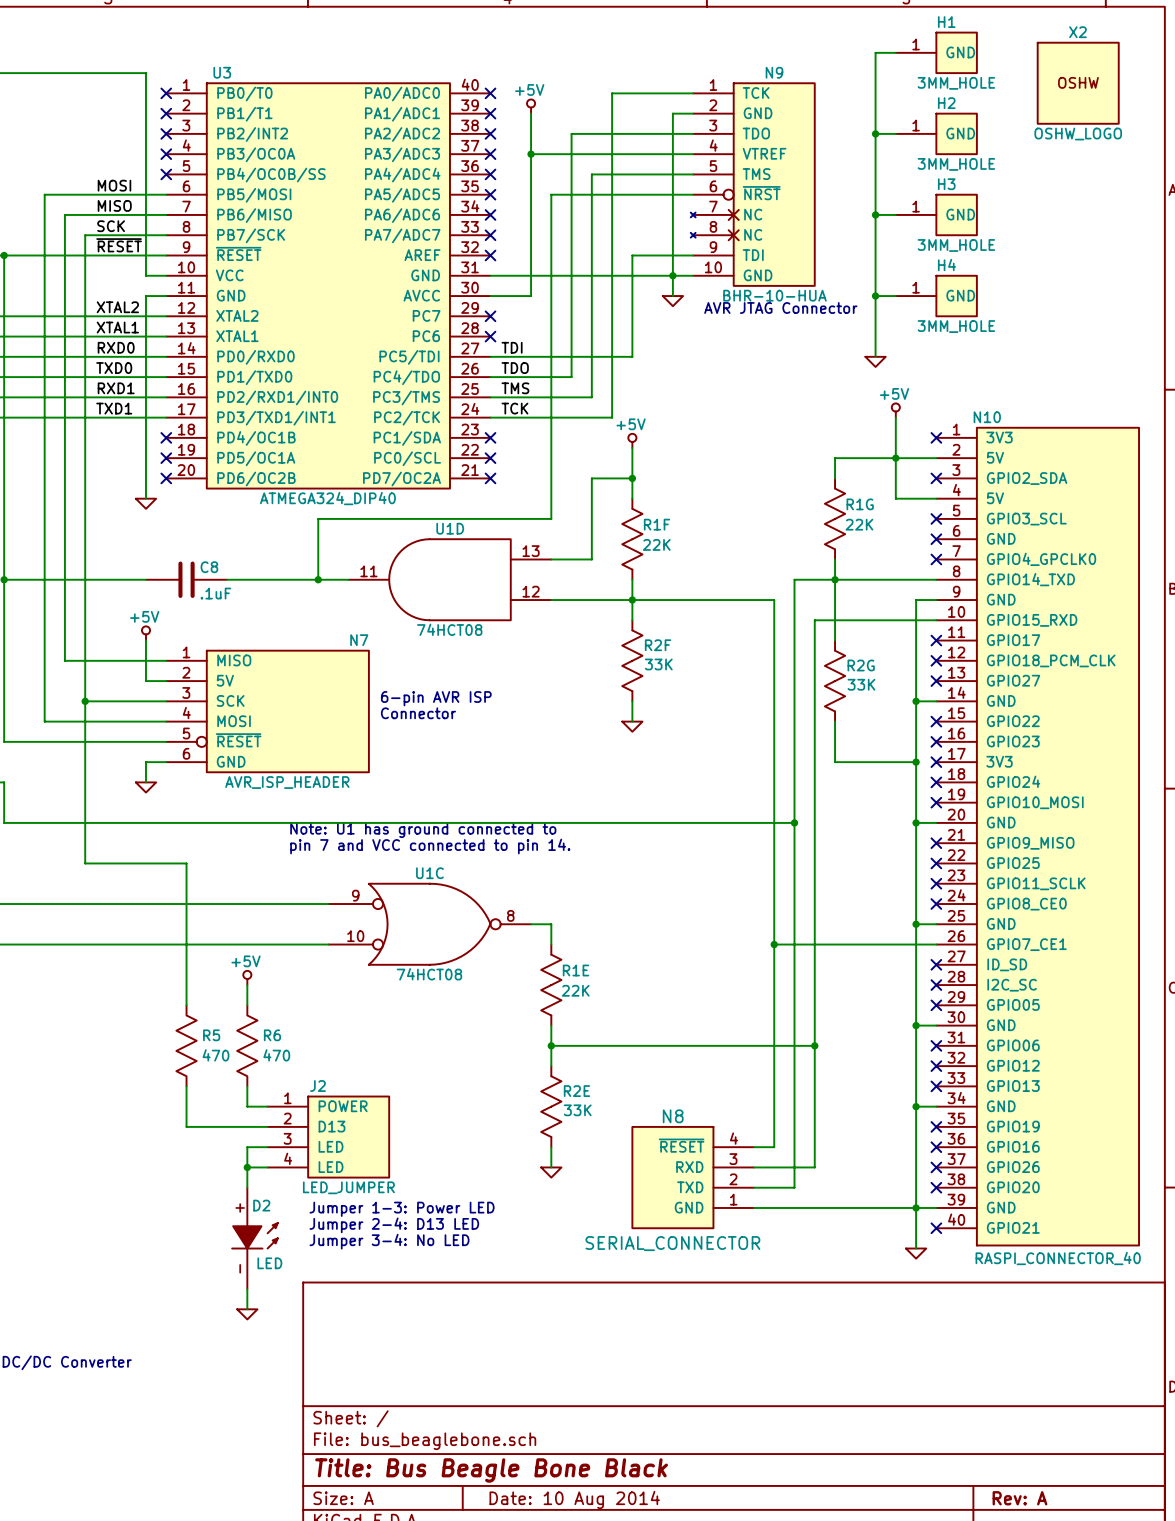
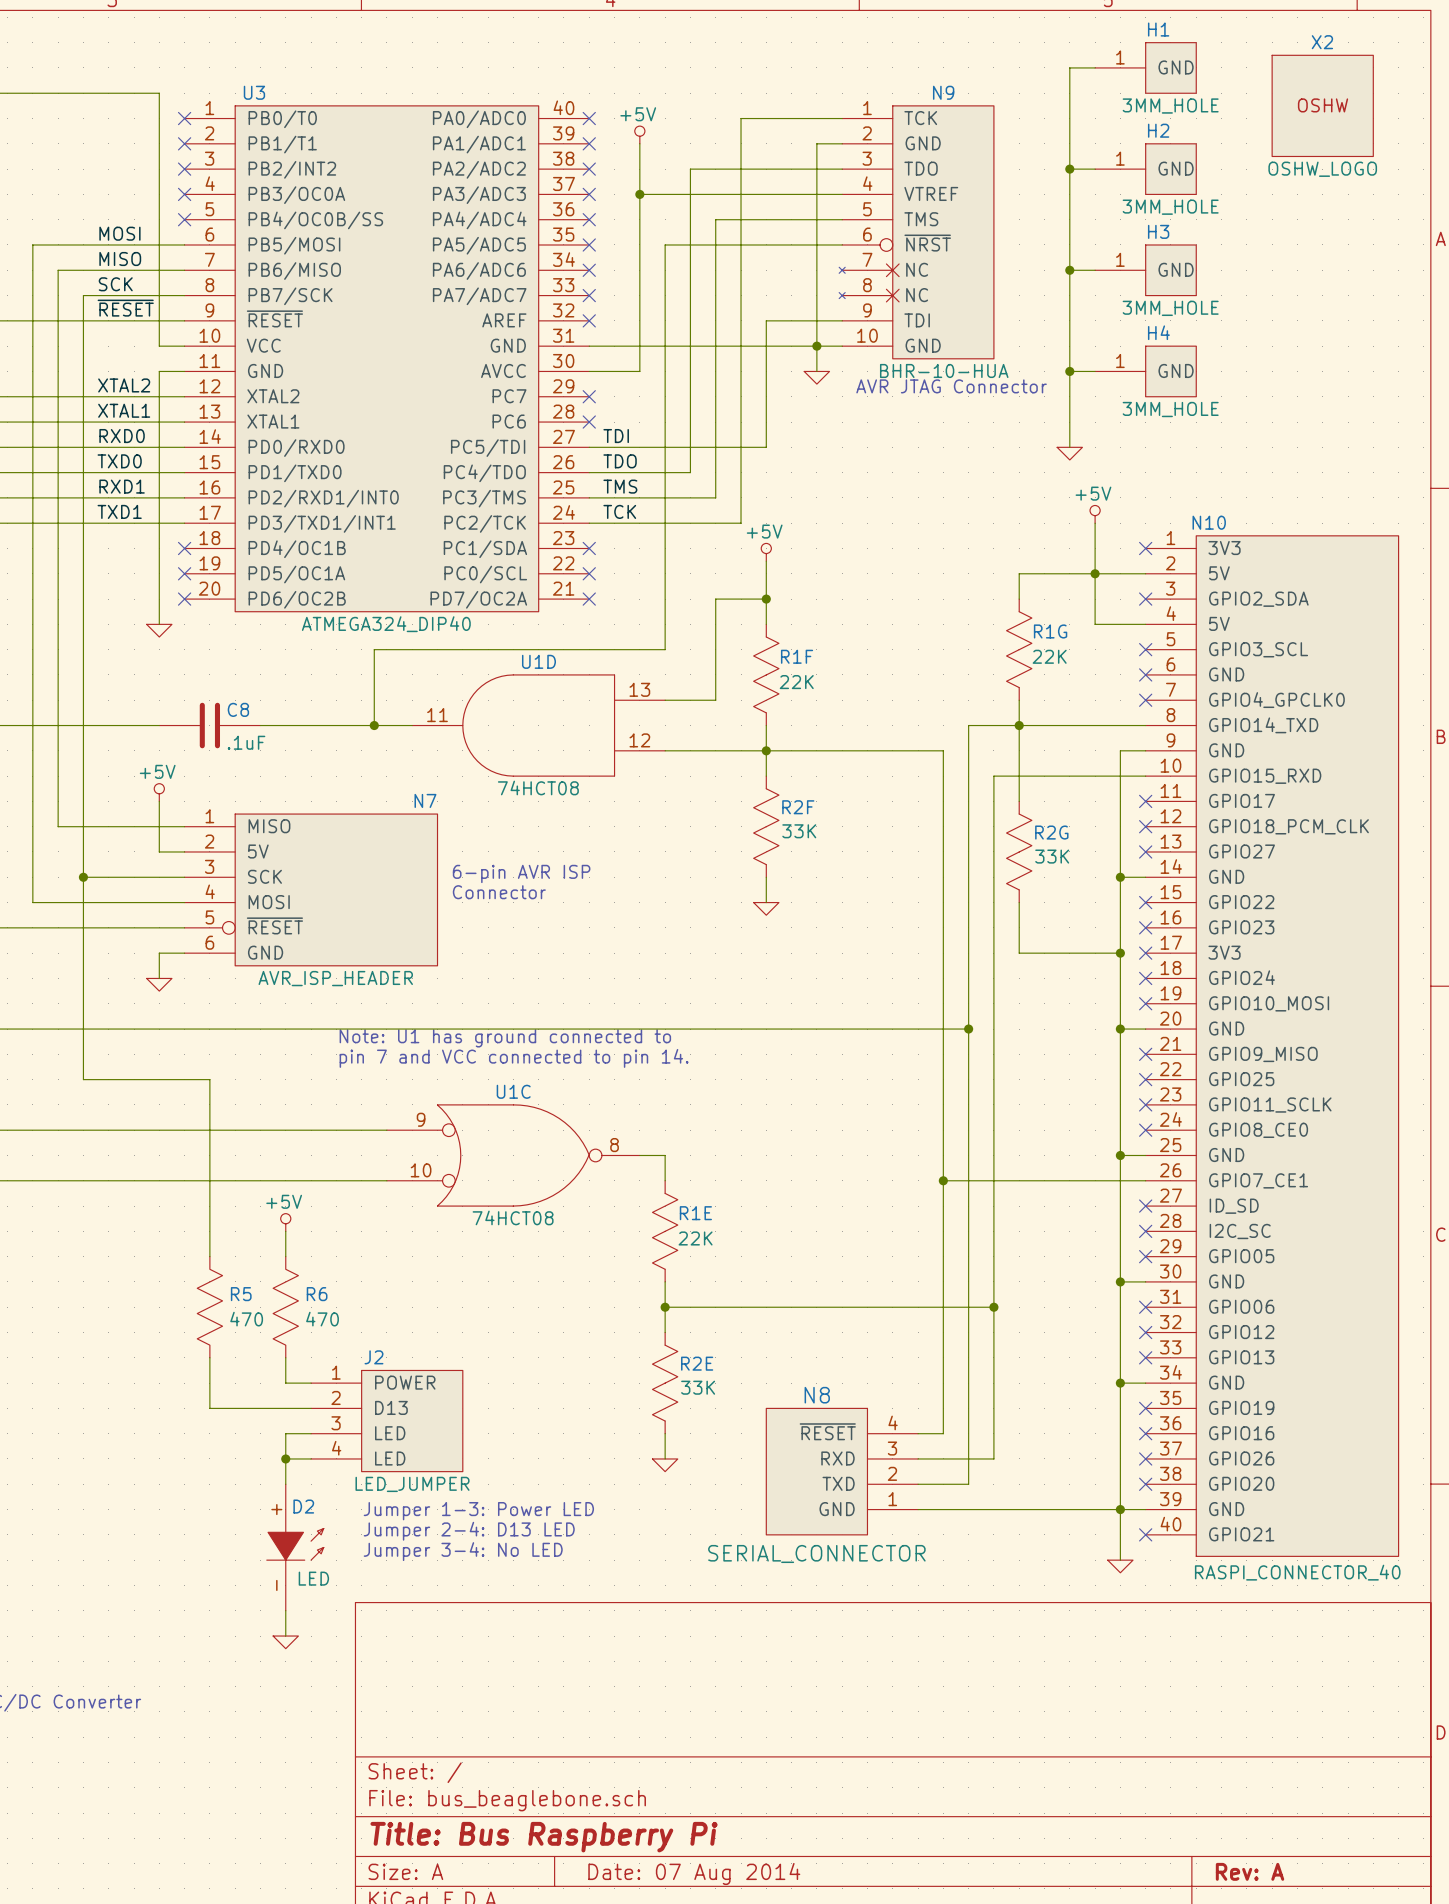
title block: Title: Bus Beagle Bone Black (491, 1470) -> Title: Bus Raspberry Pi (544, 1837)
title block: Date: 10 Aug 2014 (574, 1499) -> Date: 07 Aug 2014 (694, 1873)

